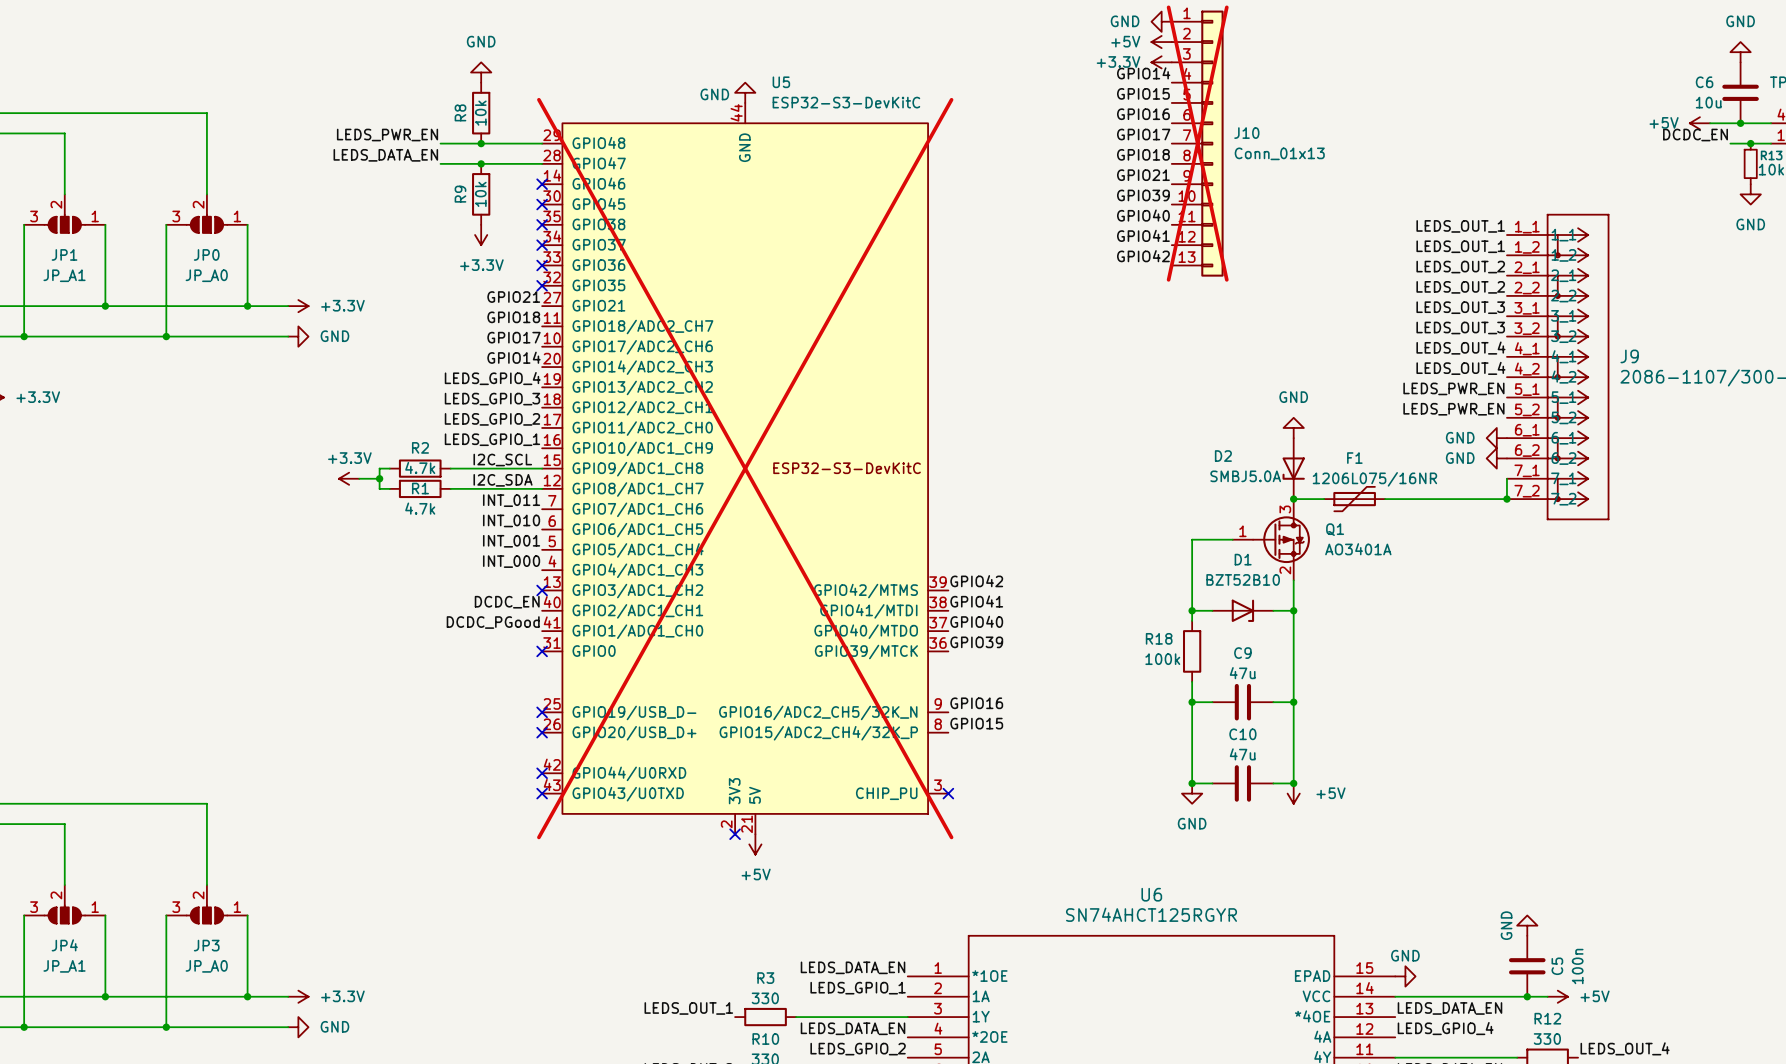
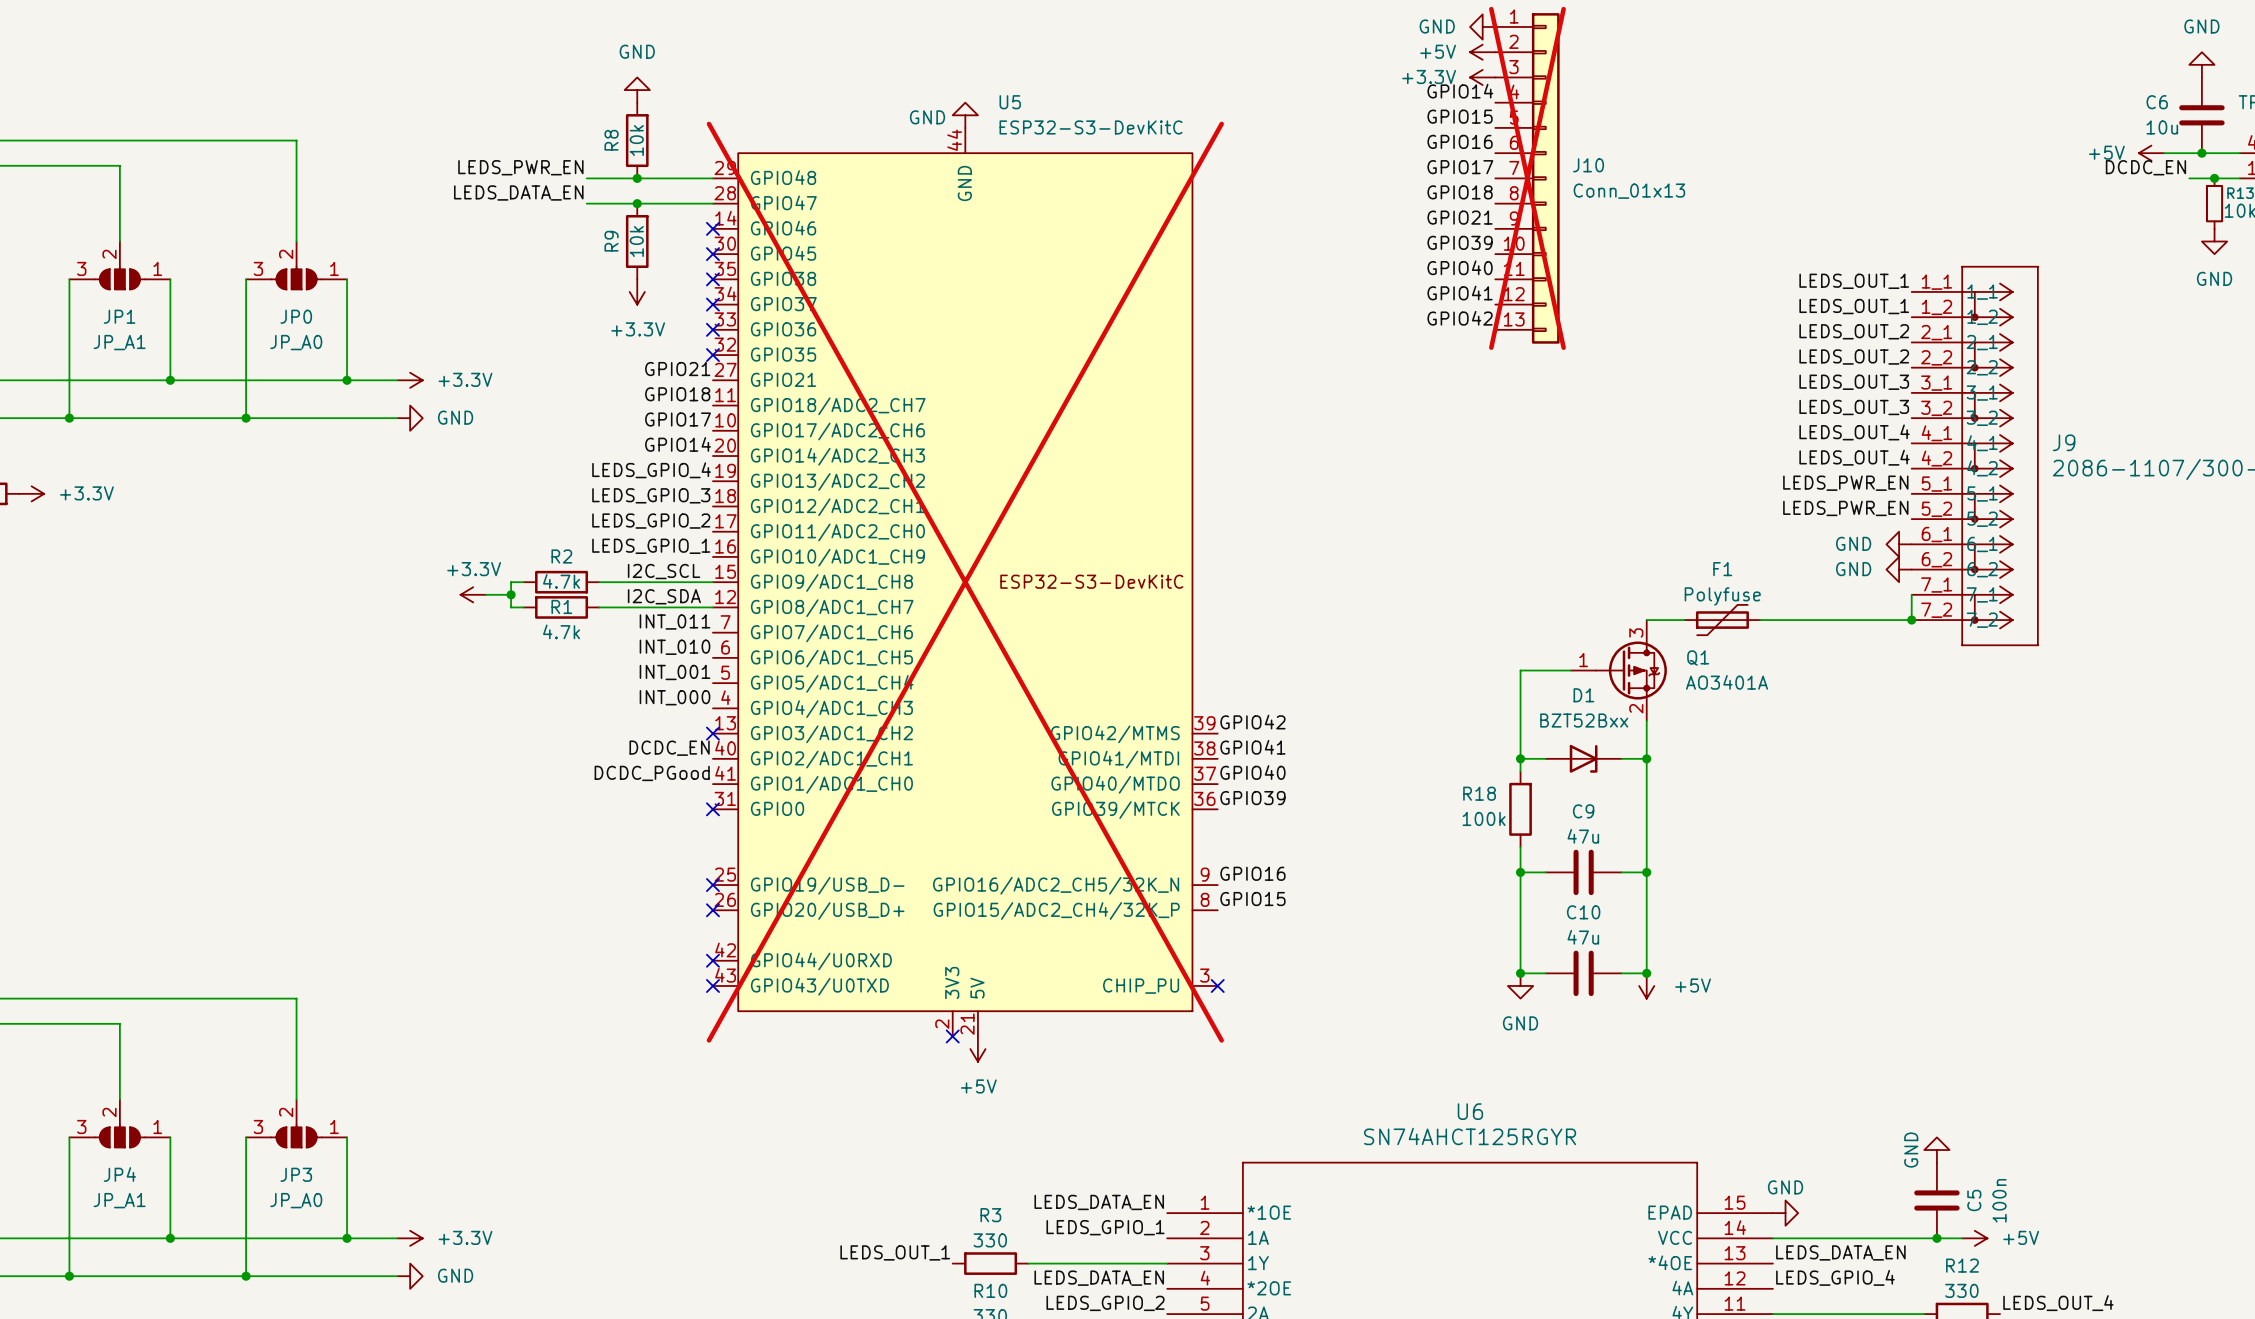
power symbol: GND (1293, 427) -> none
D2: SMBJ5.0A (1293, 468) -> none
F1 value: 1206L075/16NR (1374, 479) -> Polyfuse (1722, 596)
junction: (1293, 499) -> none
D1 value: BZT52B10 (1243, 579) -> BZT52Bxx (1584, 720)

